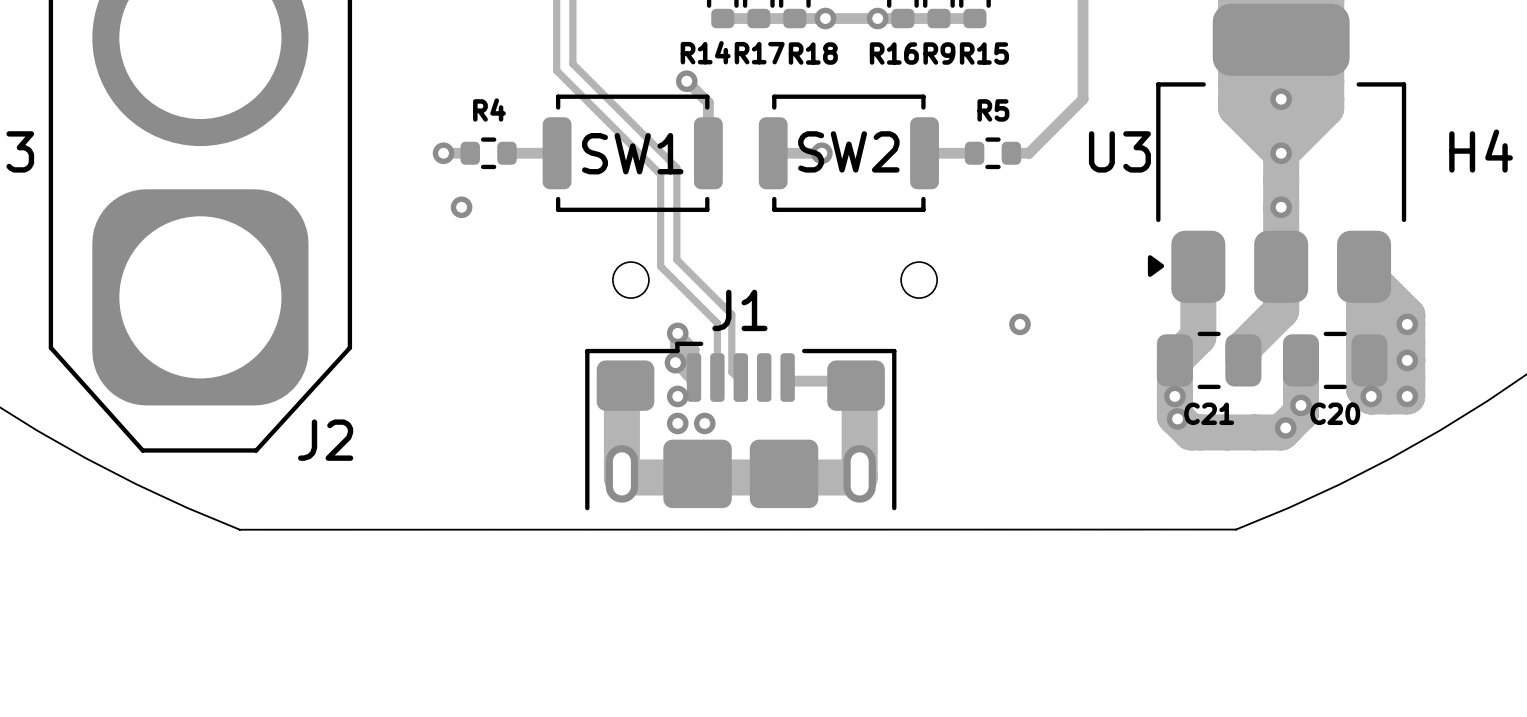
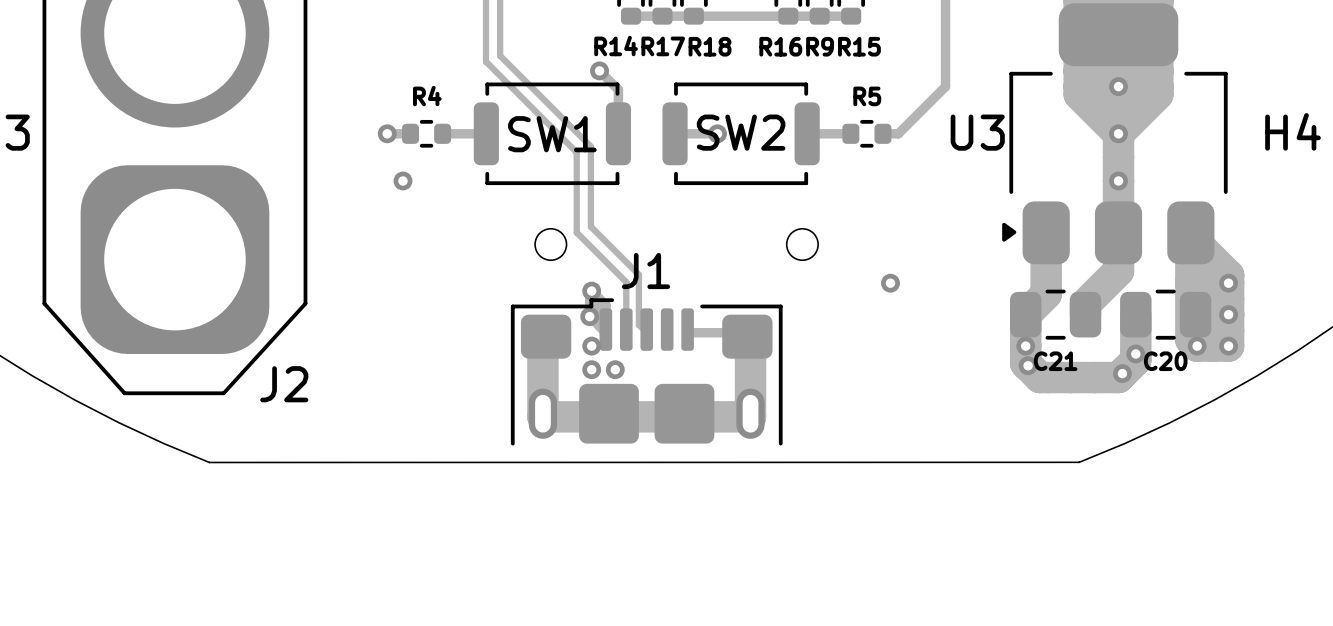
via: (825, 18) -> none
via: (877, 18) -> none

